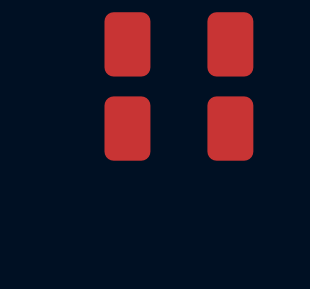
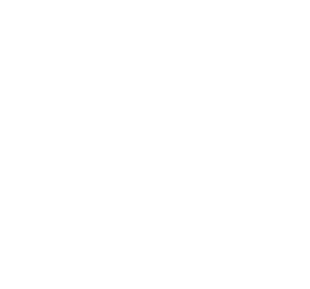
part: (178, 44) -> none
part: (178, 128) -> none

